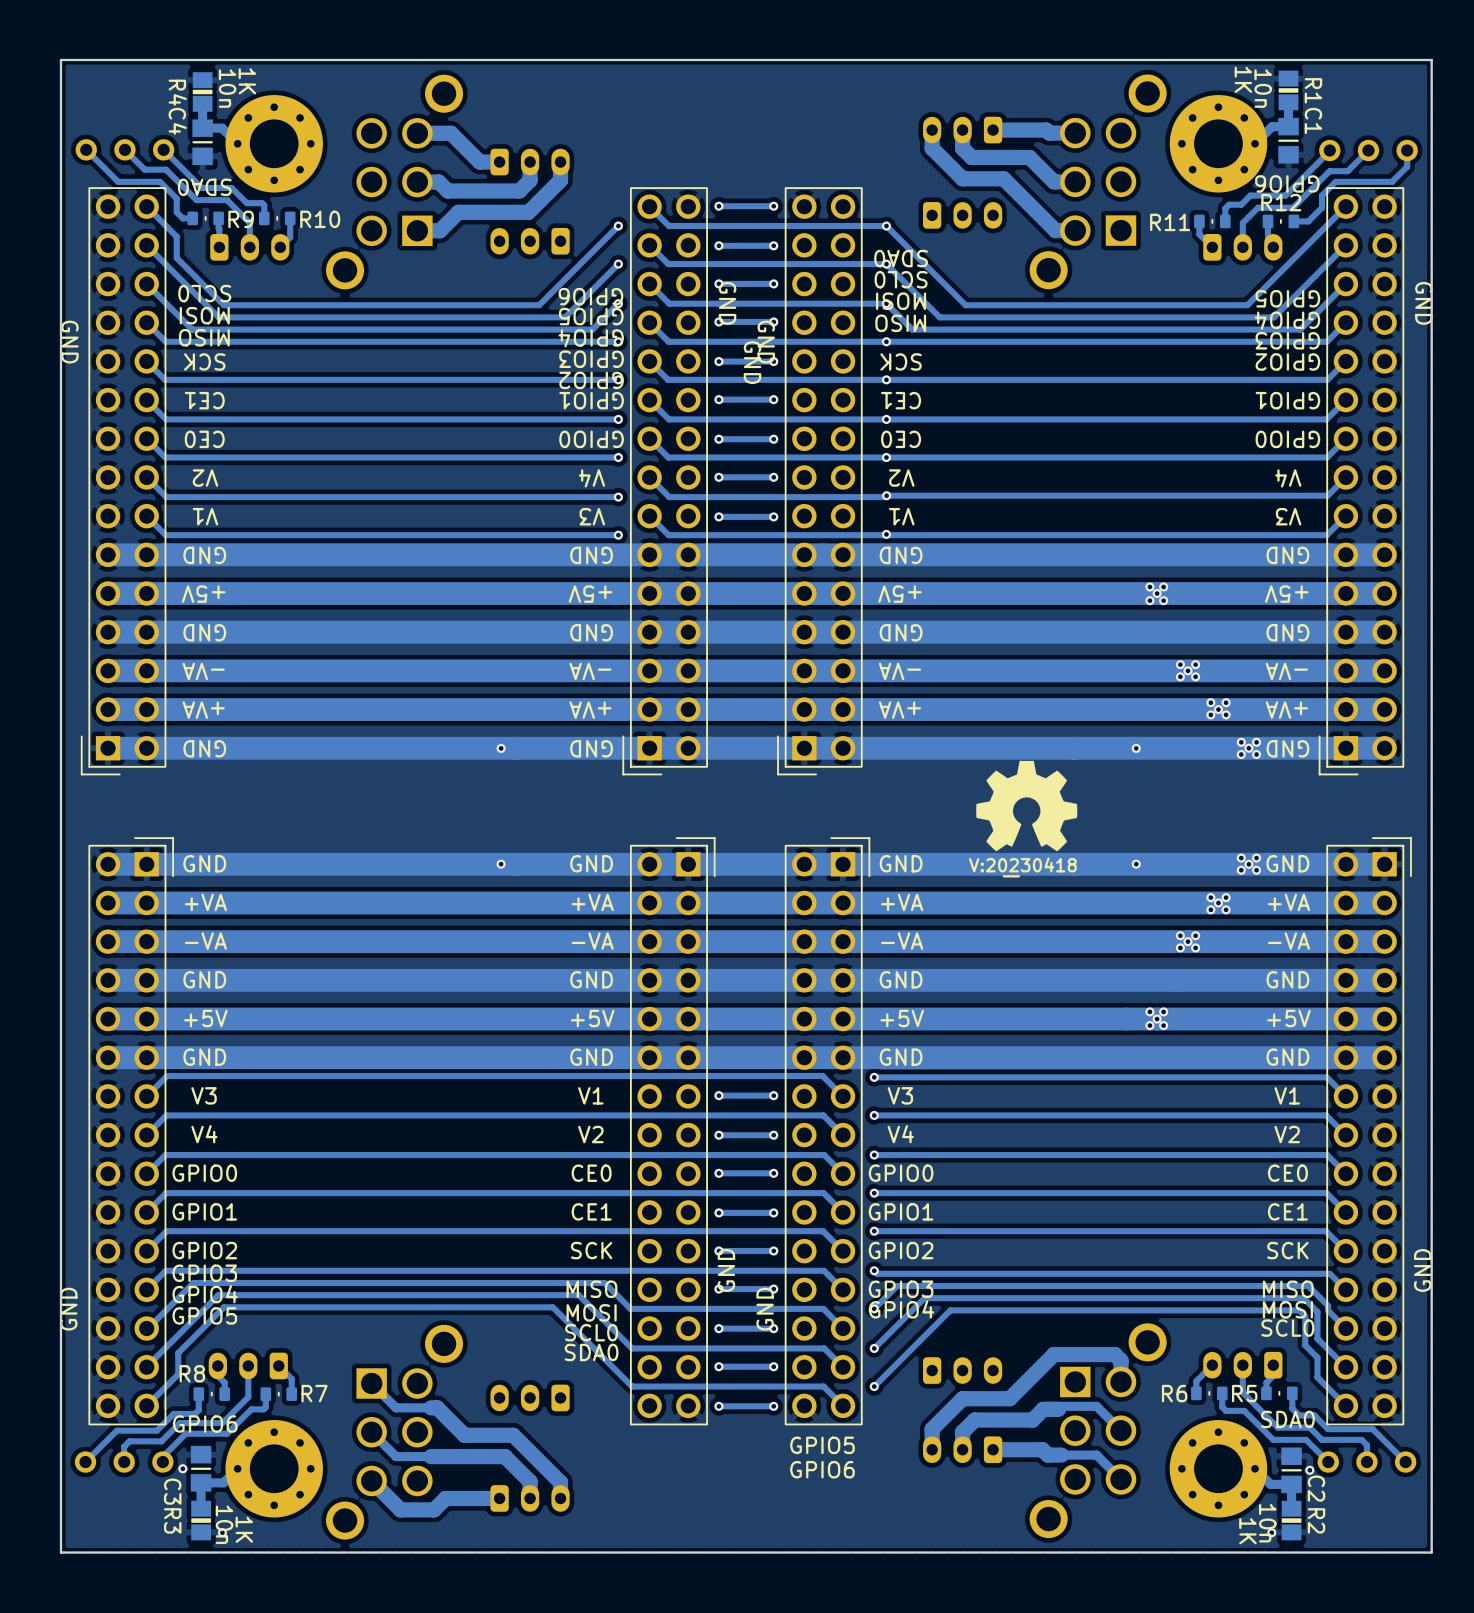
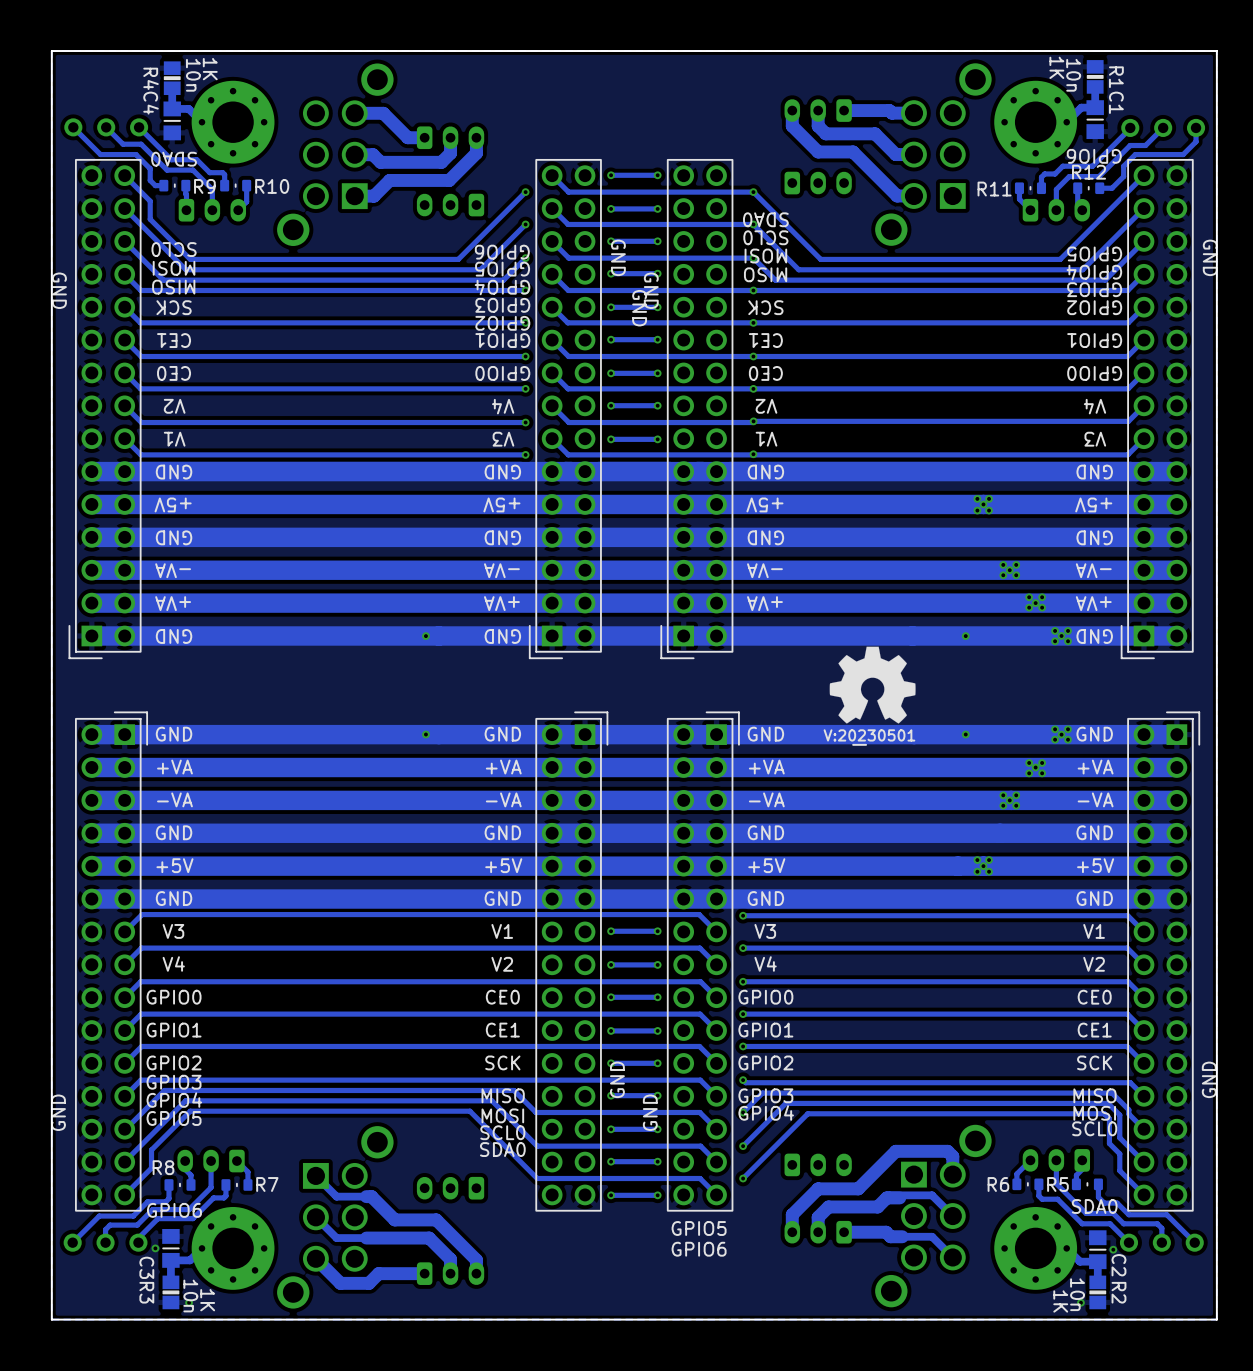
drawing shape: [969, 857, 1077, 878] -> [823, 729, 916, 746]

